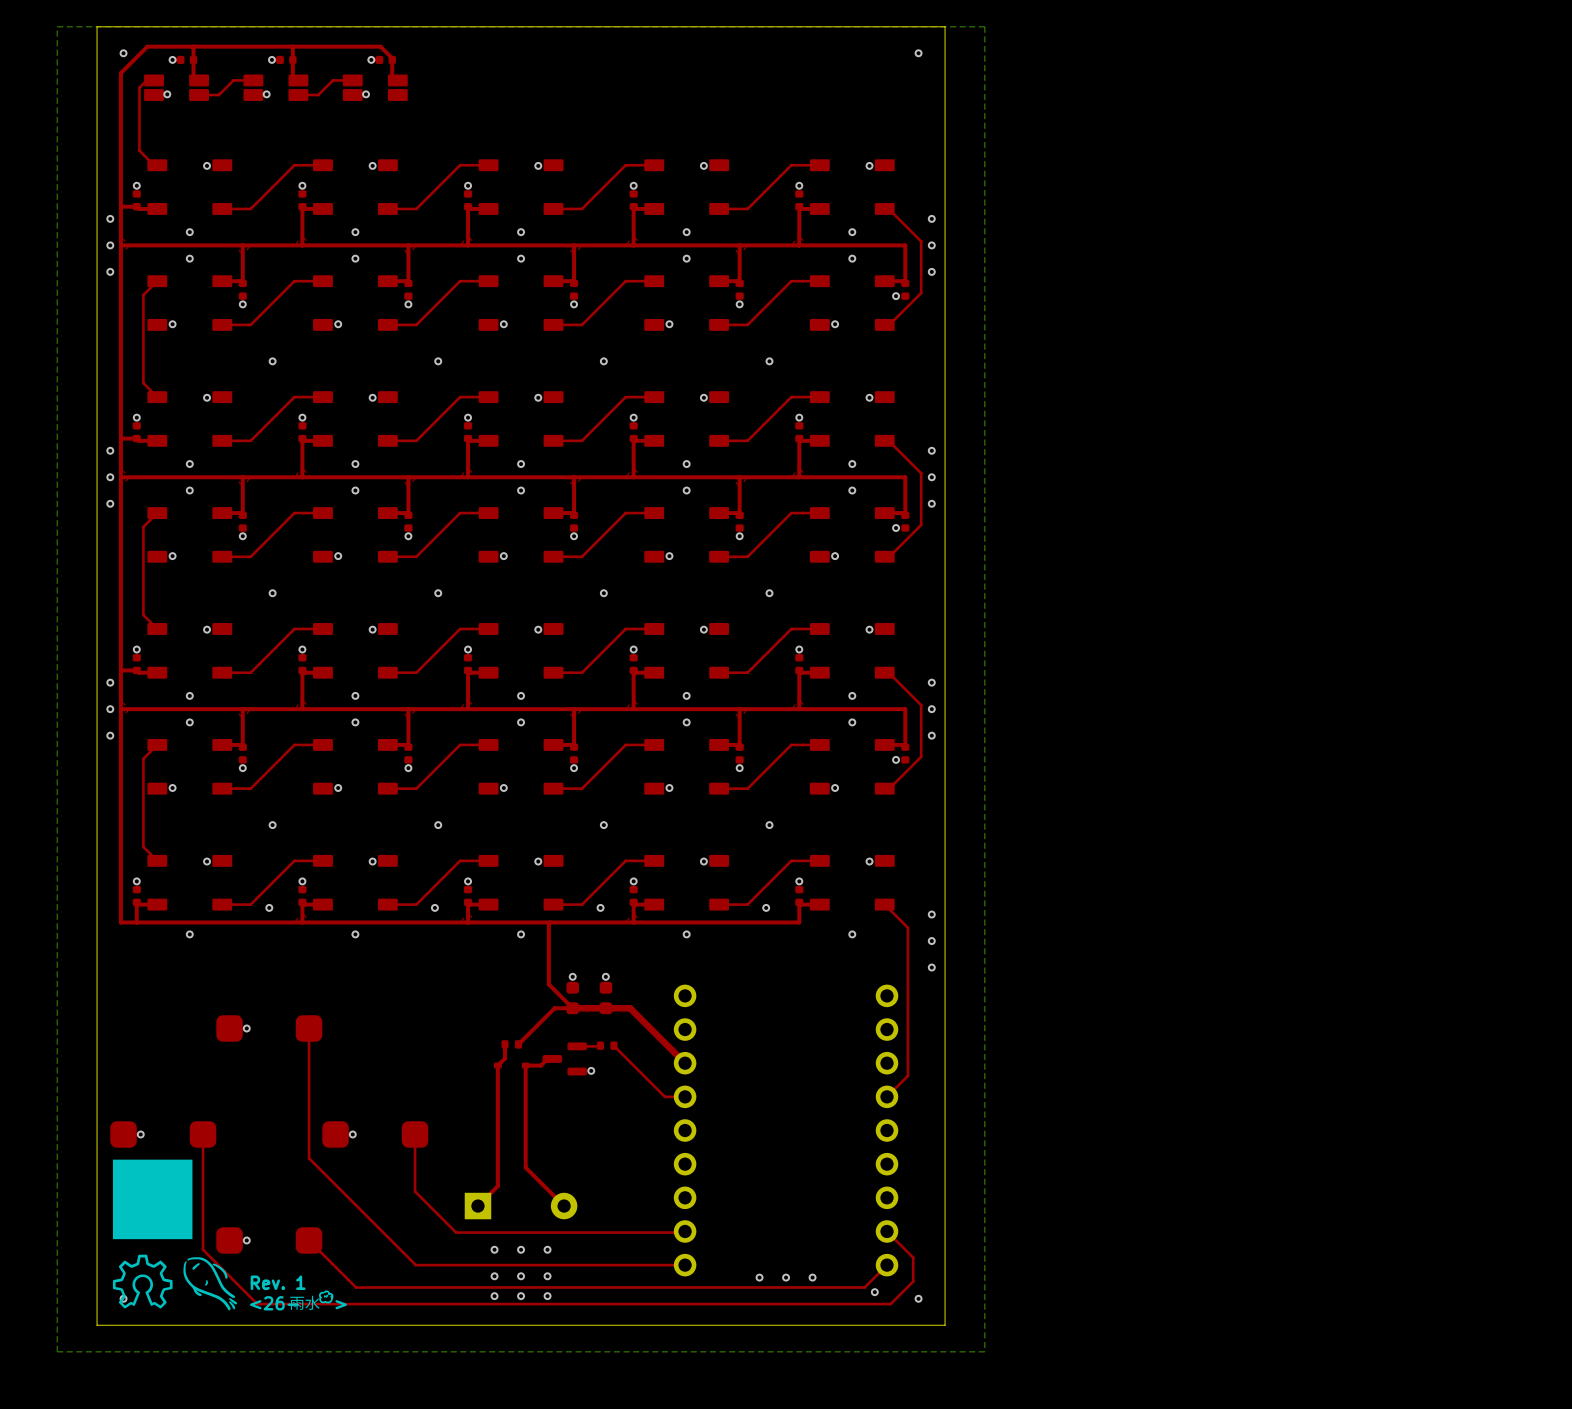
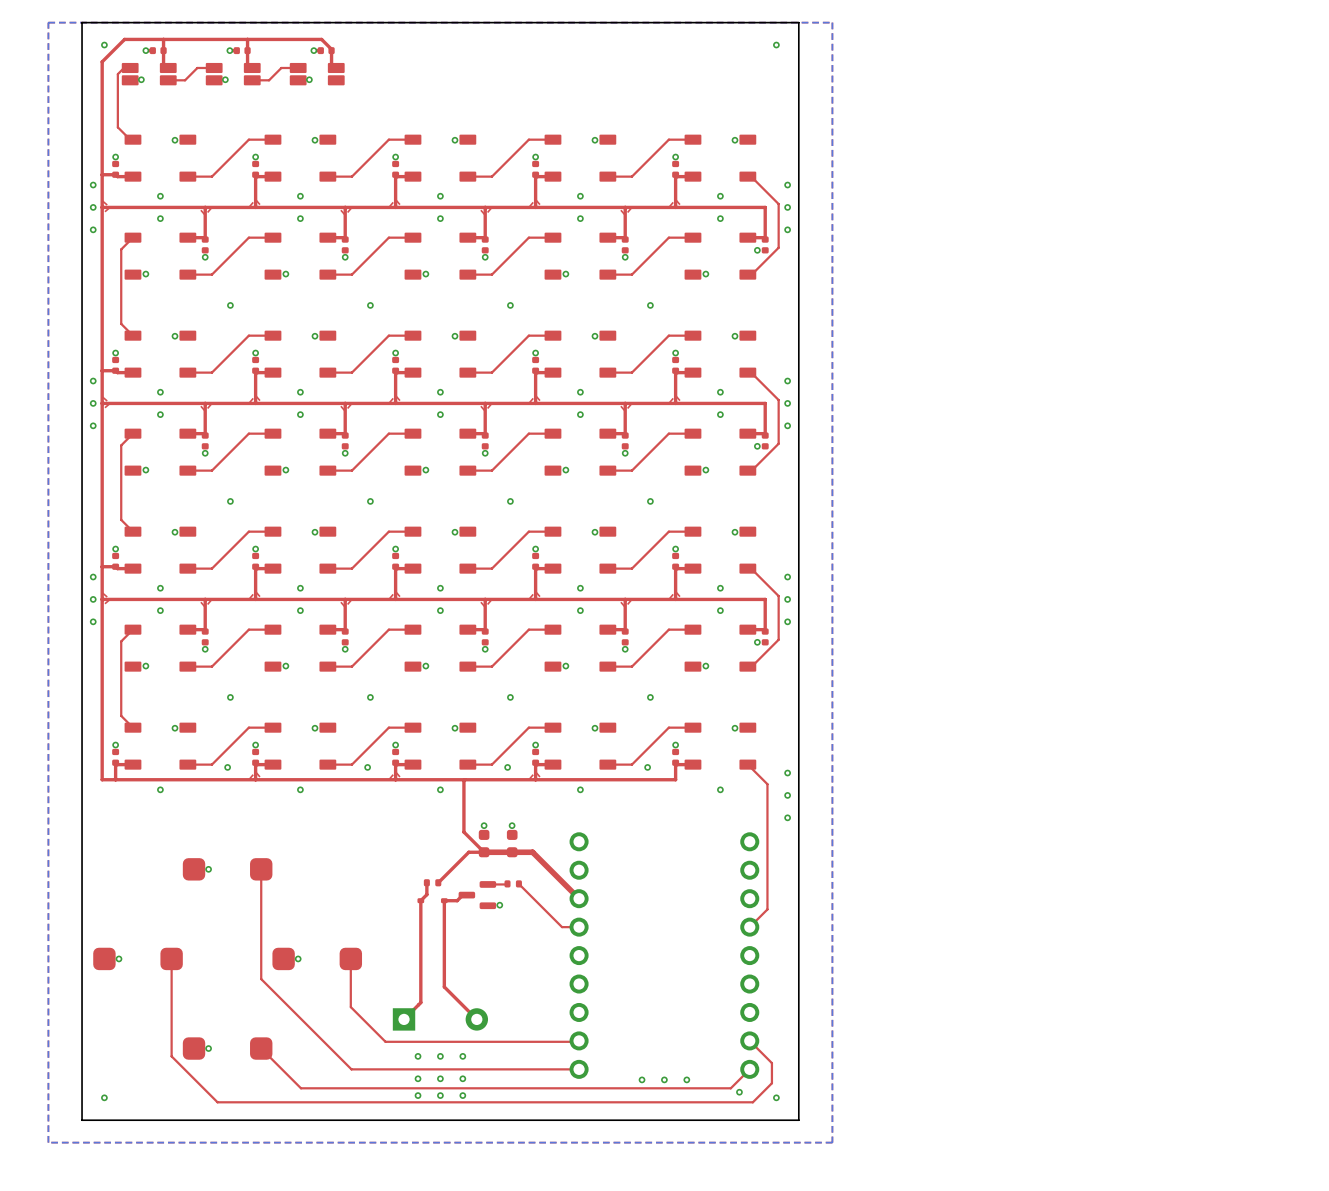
drawing: [112, 1159, 238, 1311] -> none
text: Rev. 1 (278, 1282) -> none
line: (323, 1292) (320, 1294) (320, 1297) -> none
line: (324, 1292) (327, 1291) (328, 1294) -> none
line: (329, 1293) (332, 1294) (332, 1298) -> none
line: (327, 1295) (326, 1296) -> none
line: (324, 1296) (324, 1296) -> none
line: (331, 1296) (330, 1301) (326, 1302) -> none
line: (320, 1297) (321, 1301) (324, 1301) -> none
text: 雨水 (304, 1302) -> none
text: <26- (274, 1303) -> none
text: > (341, 1304) -> none

